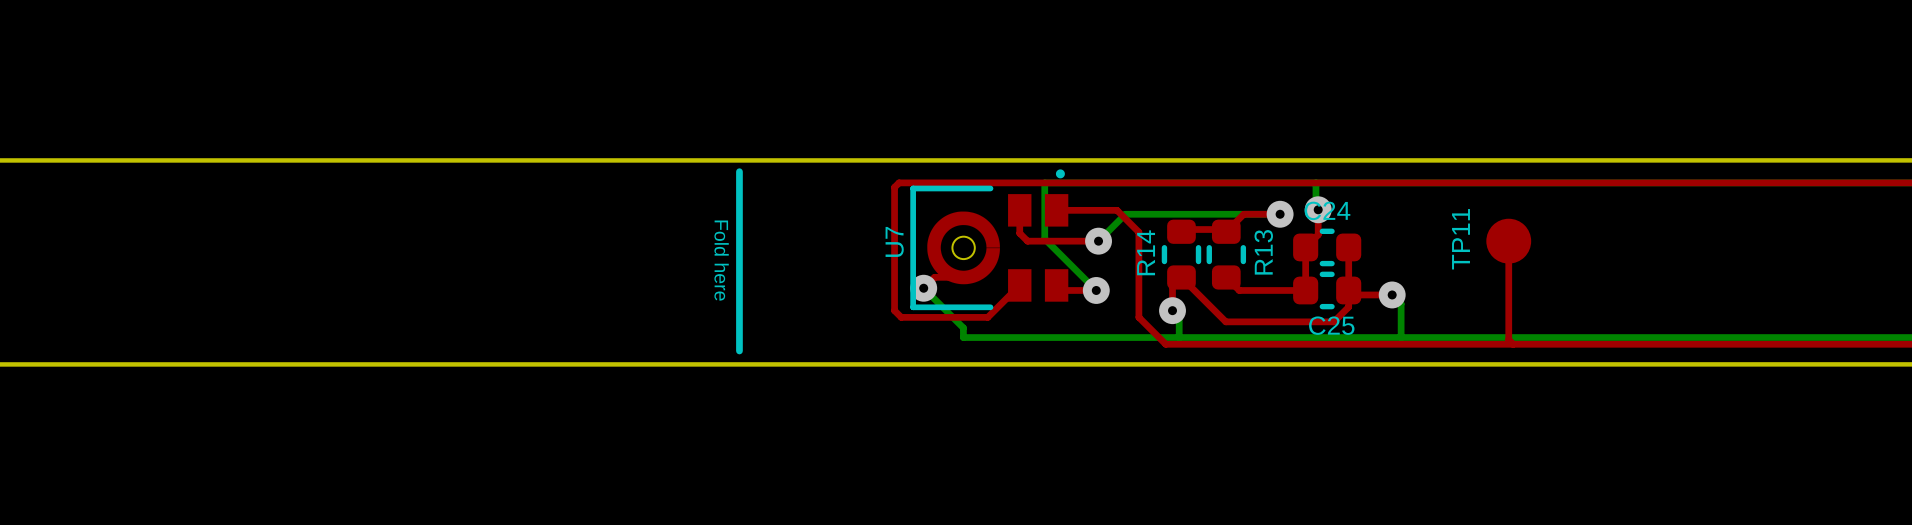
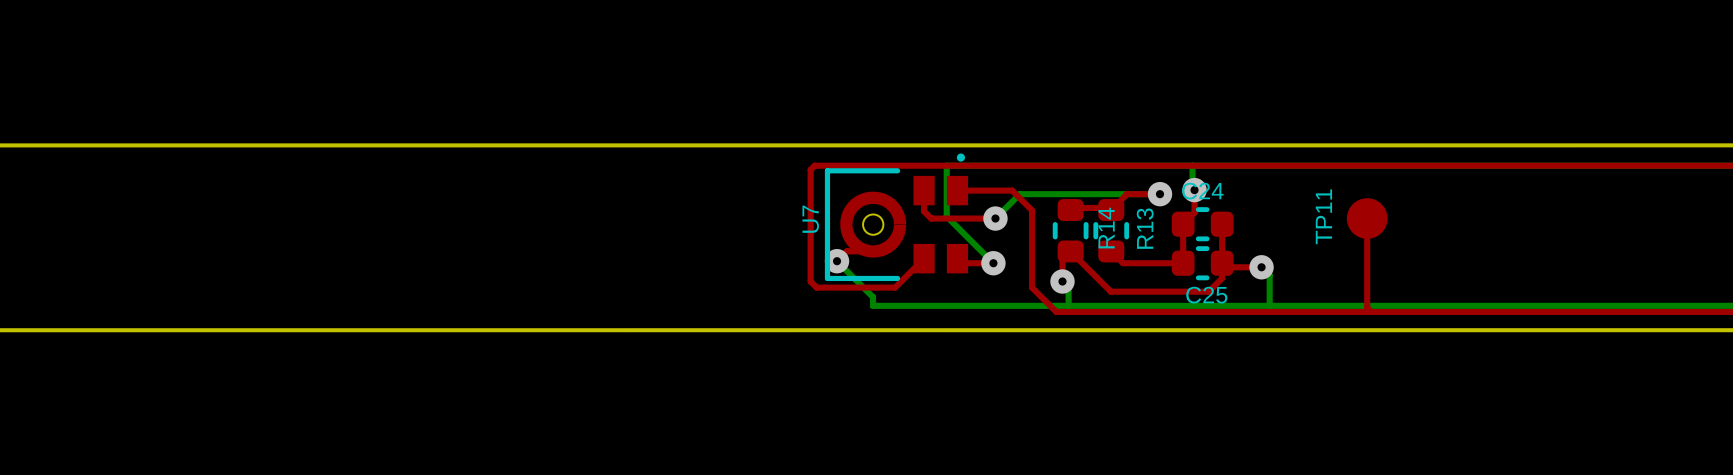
line: (739, 171) (739, 351) -> none
R14 name position: R14 (1146, 252) -> R14 (1106, 228)
text: Fold here (721, 260) -> none

